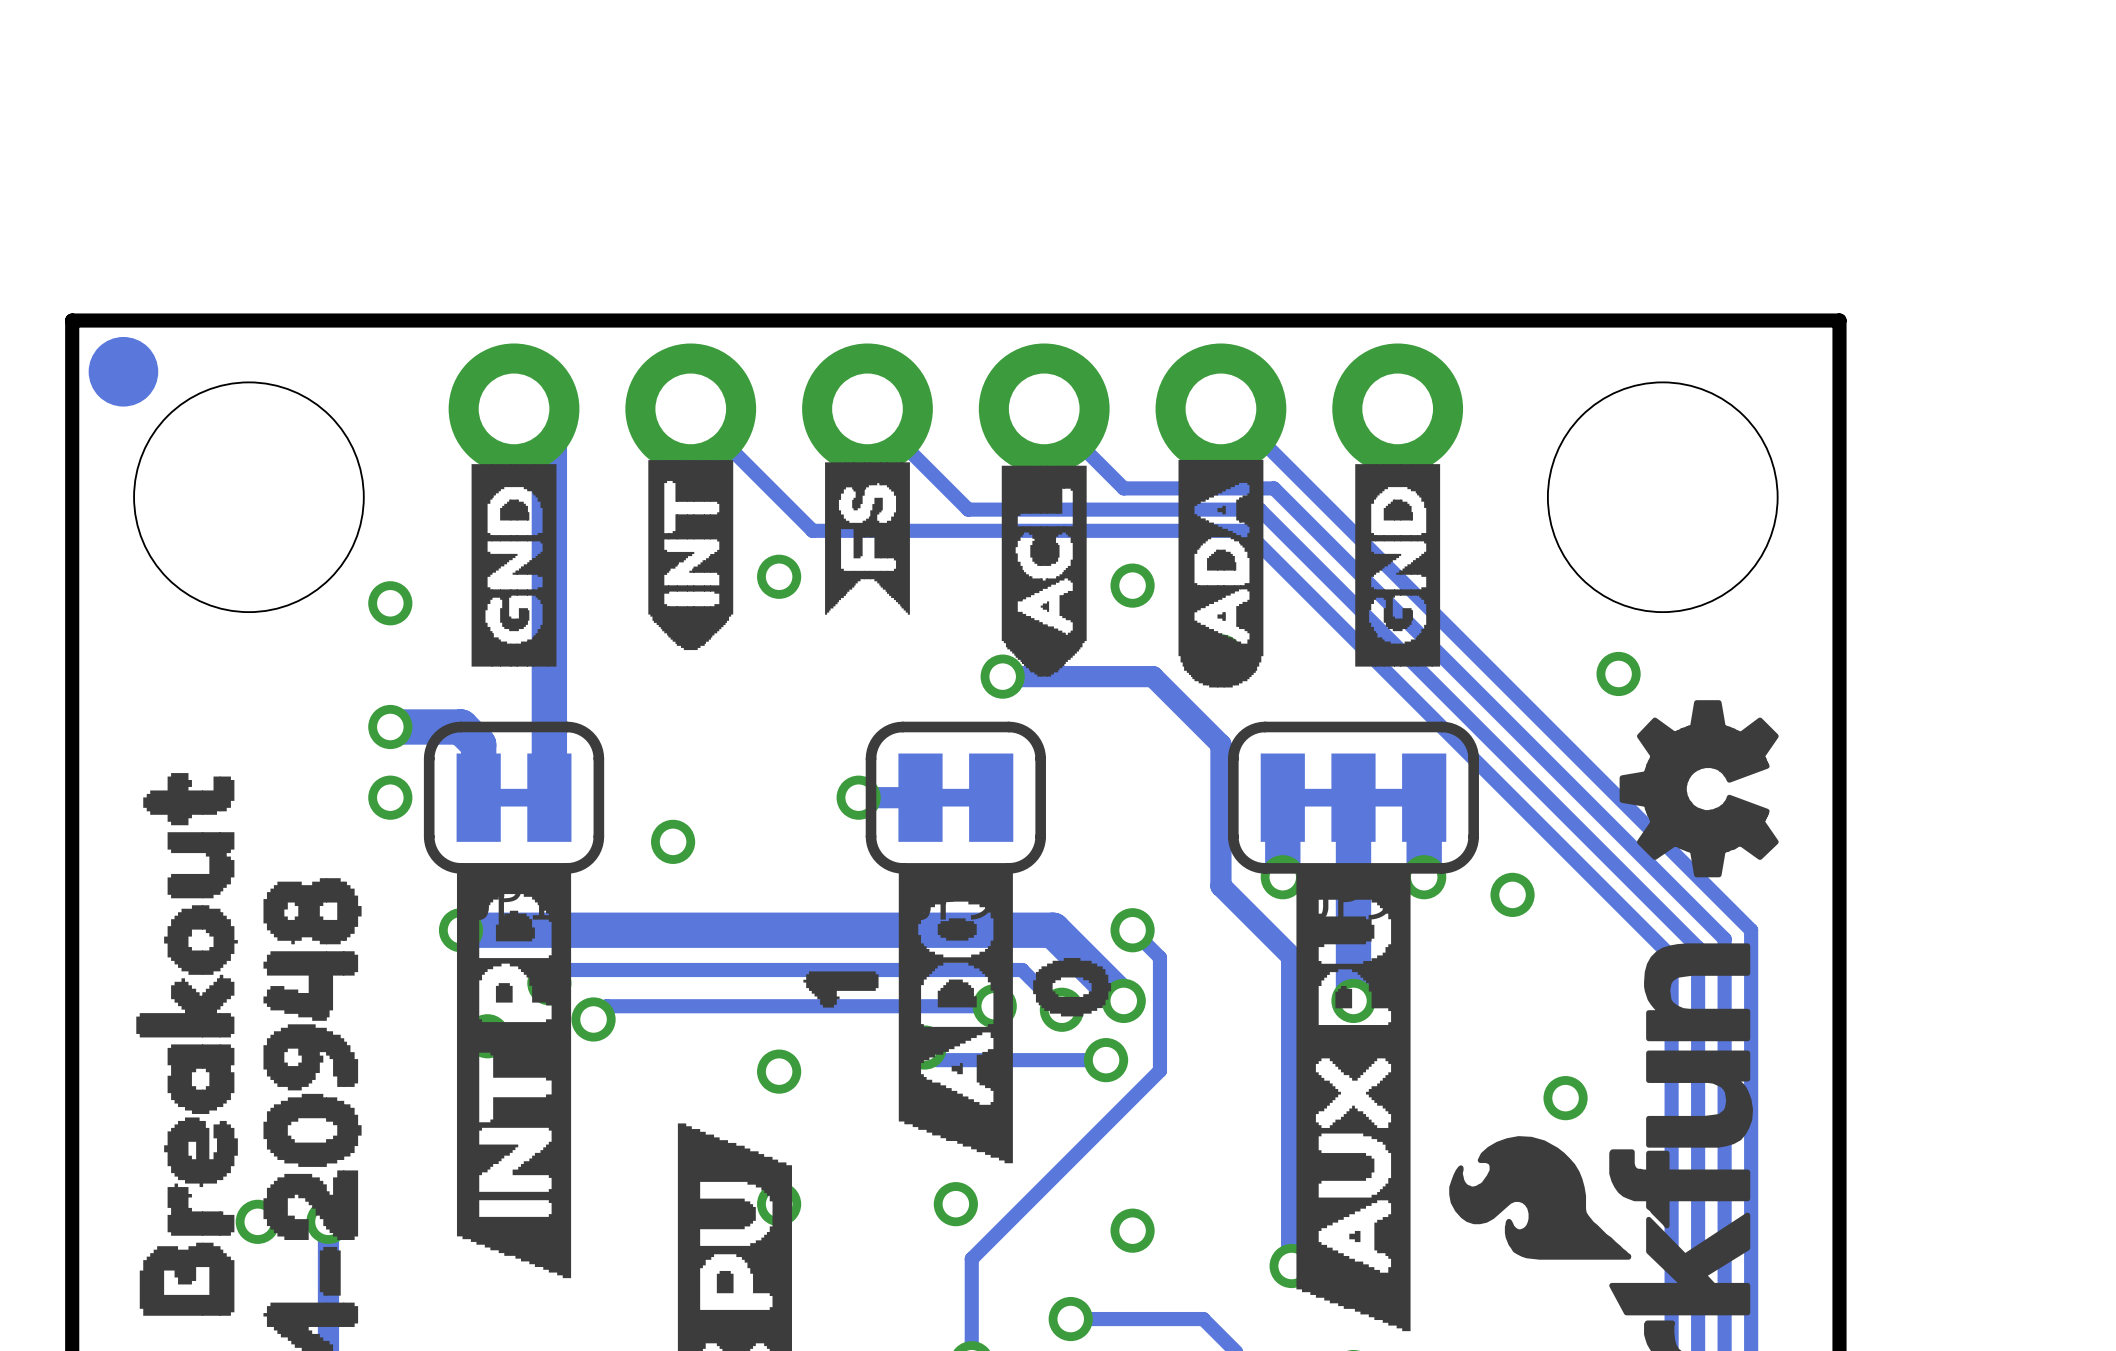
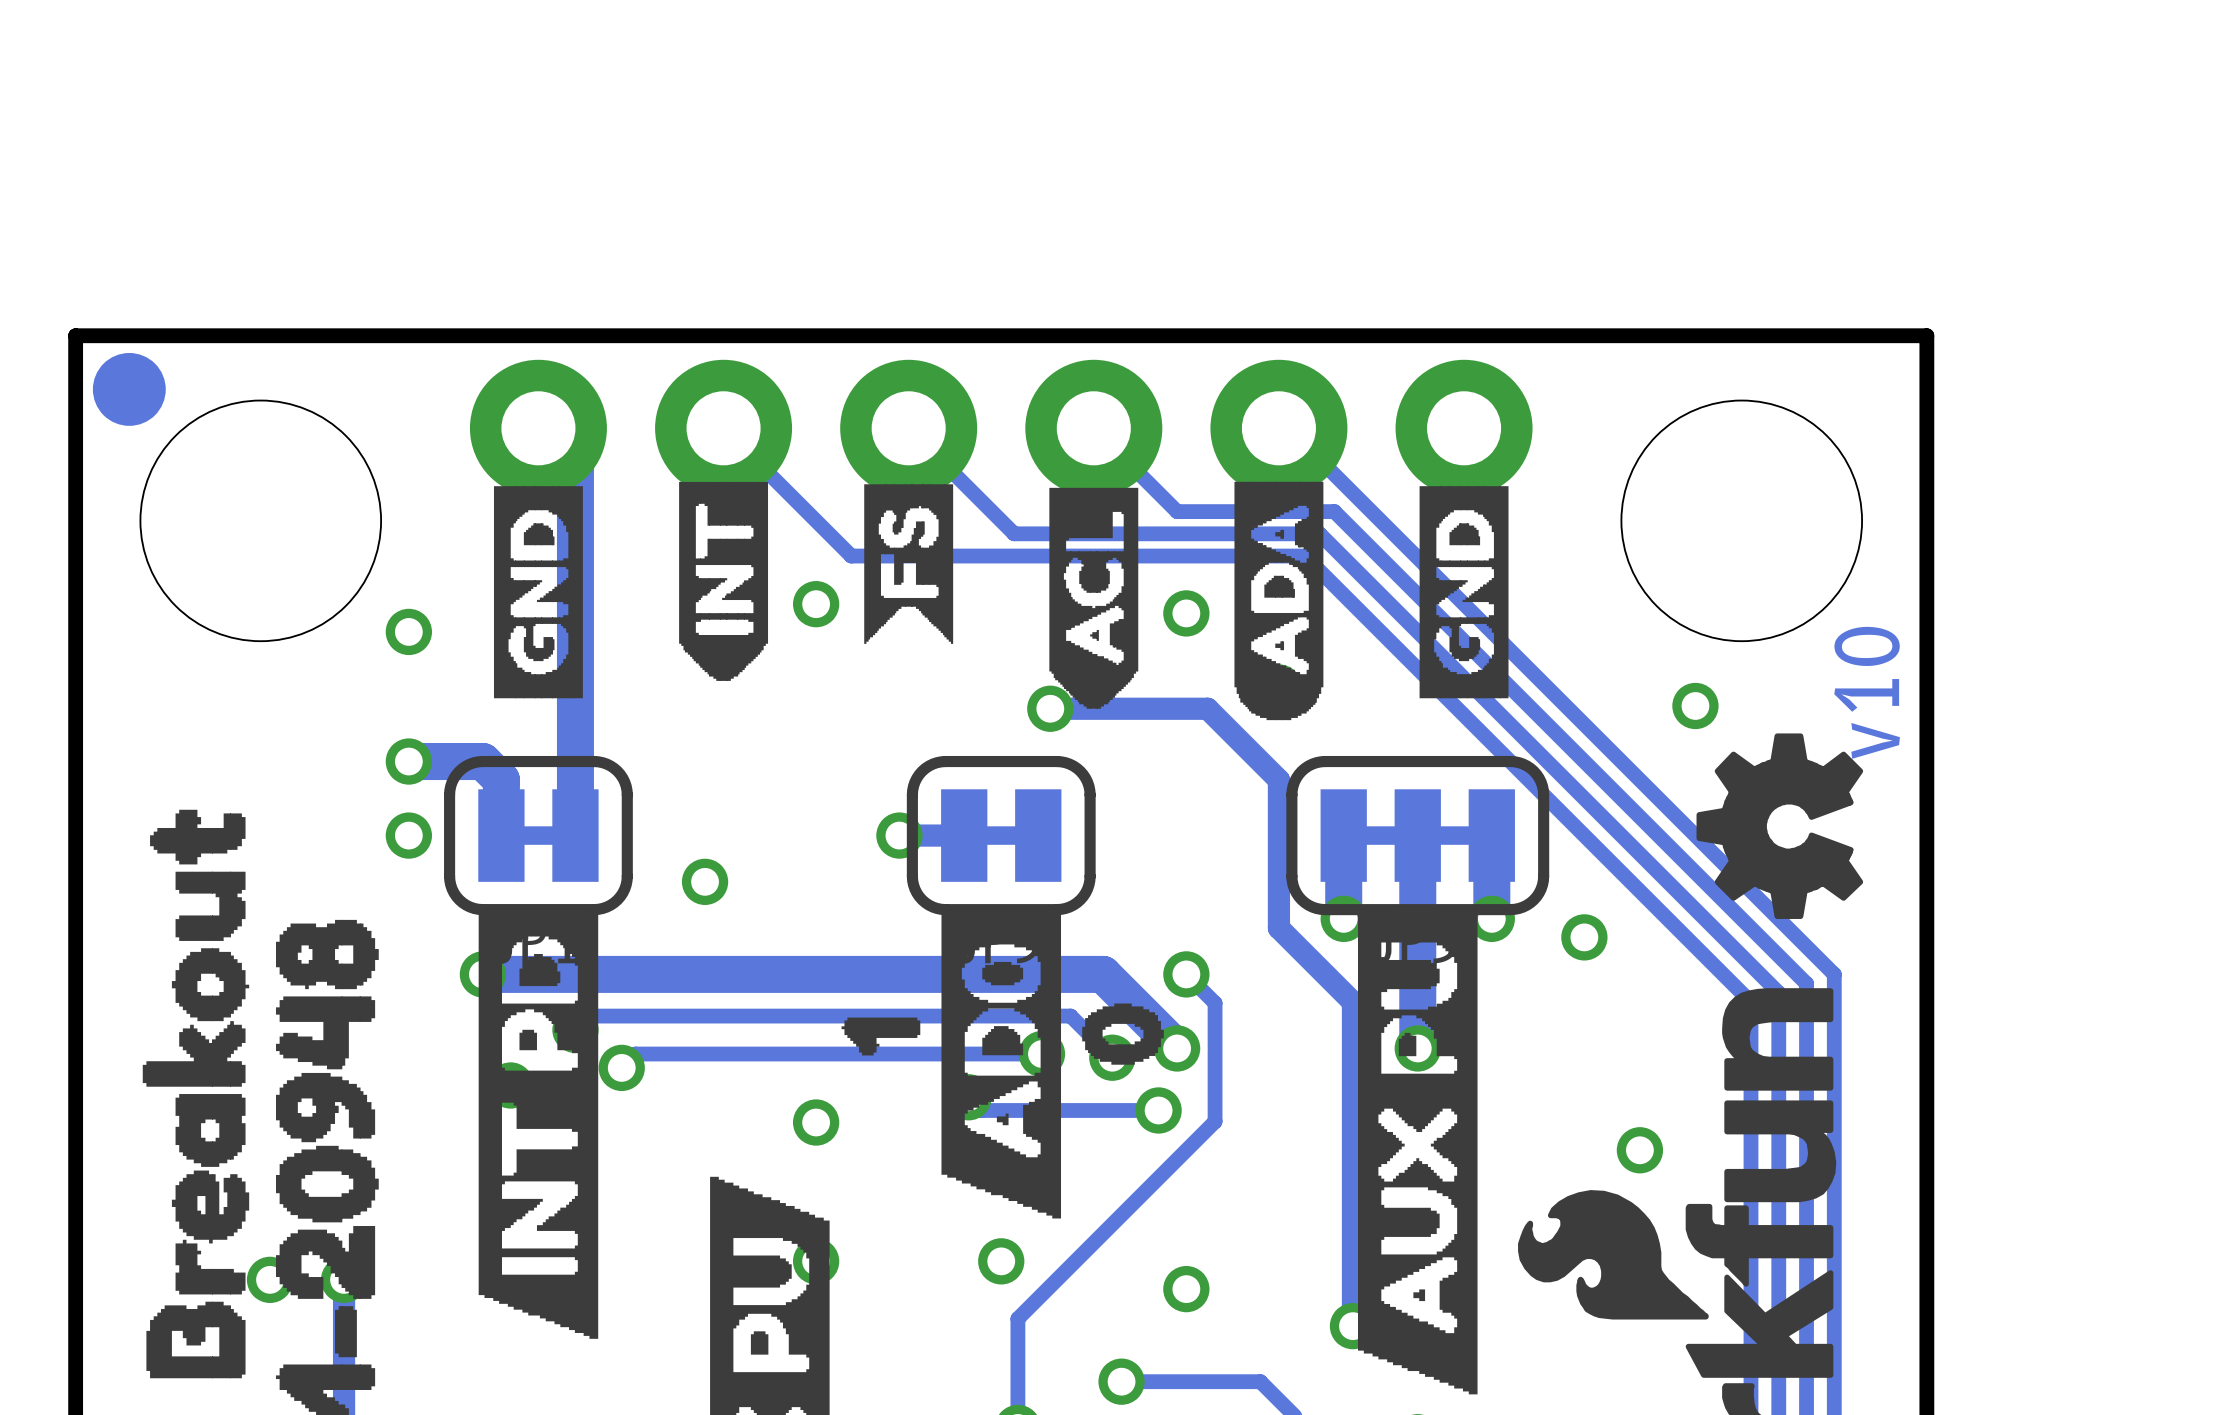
text: none -> v10 (1867, 692)

